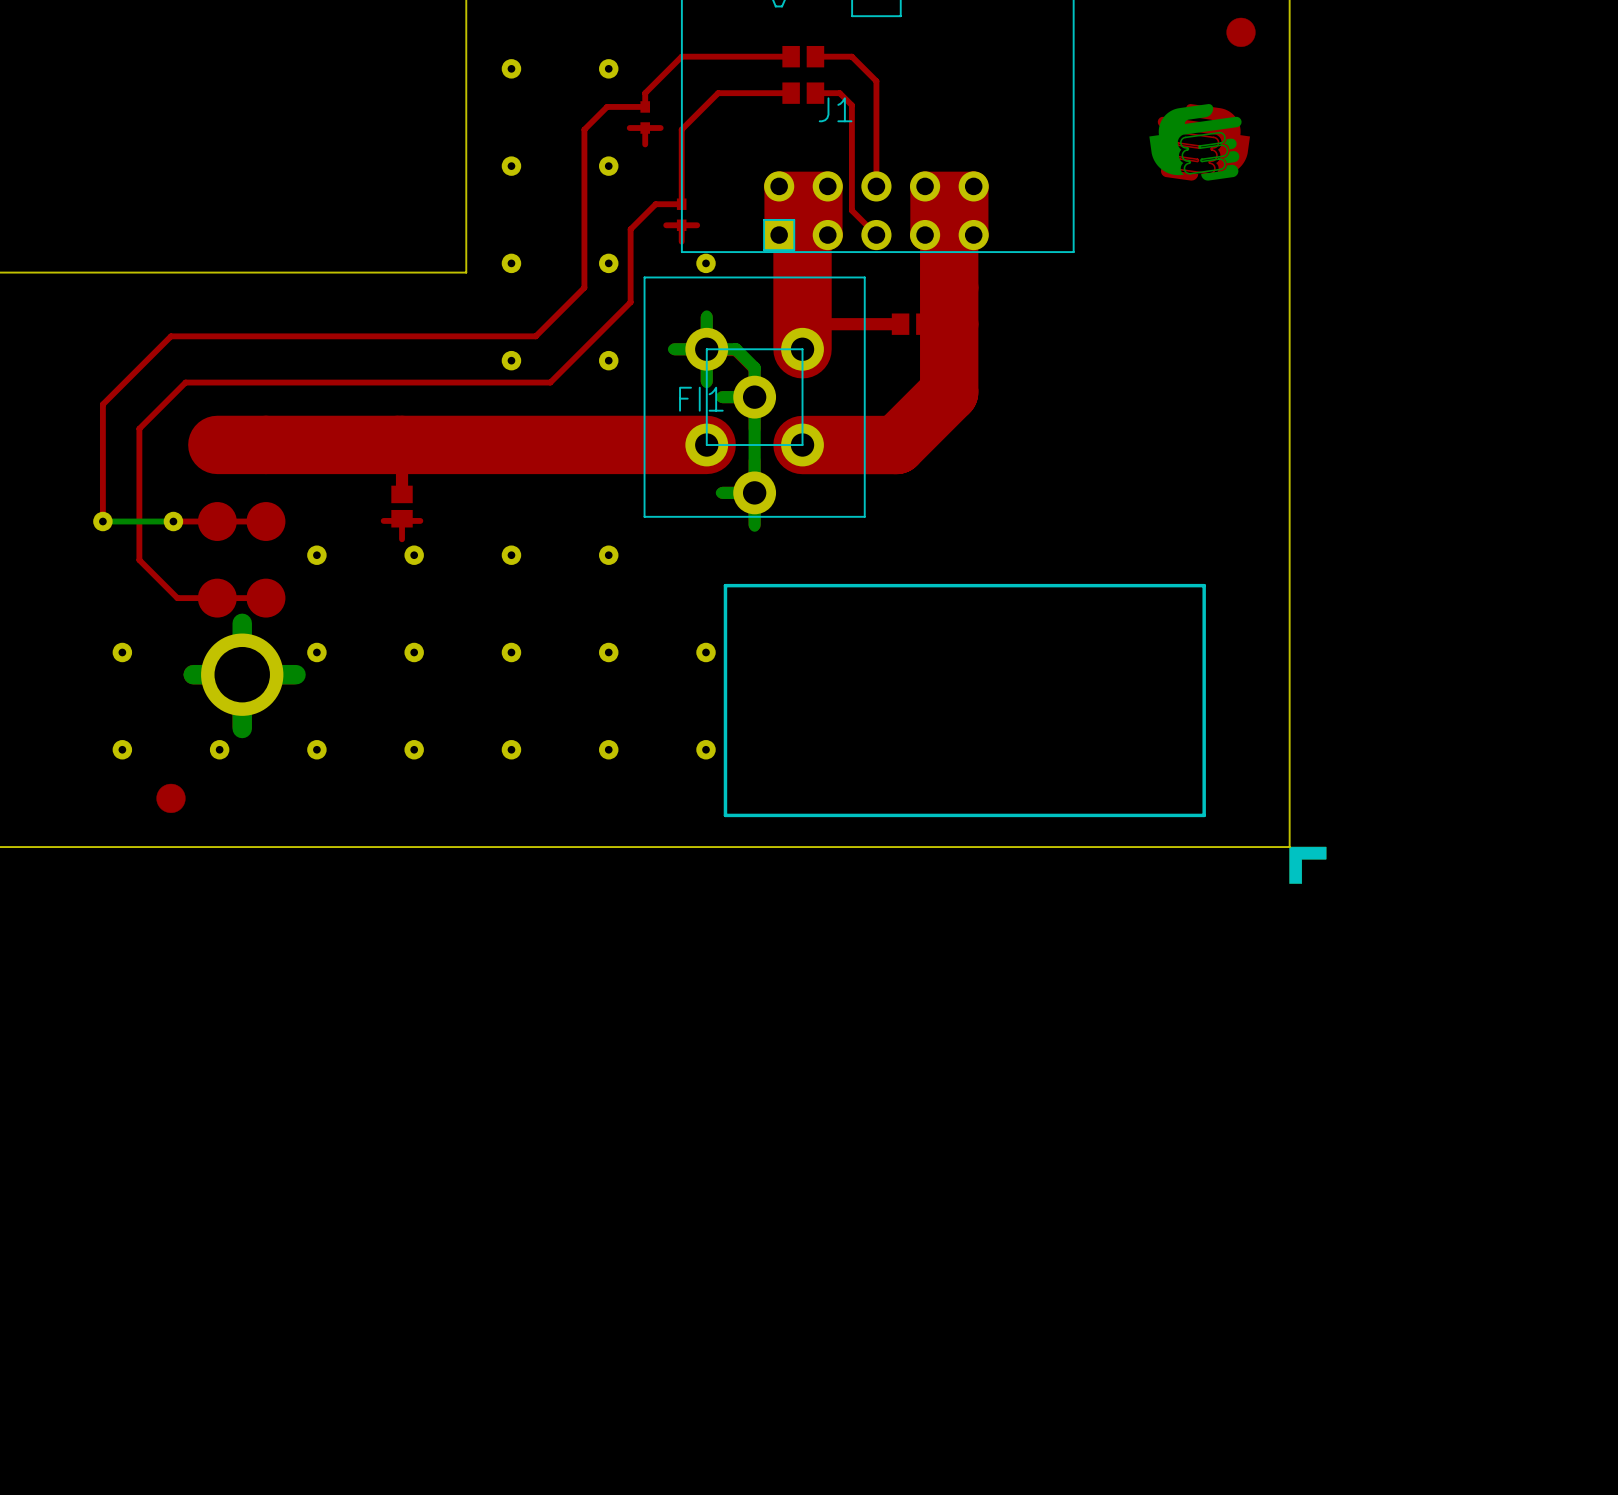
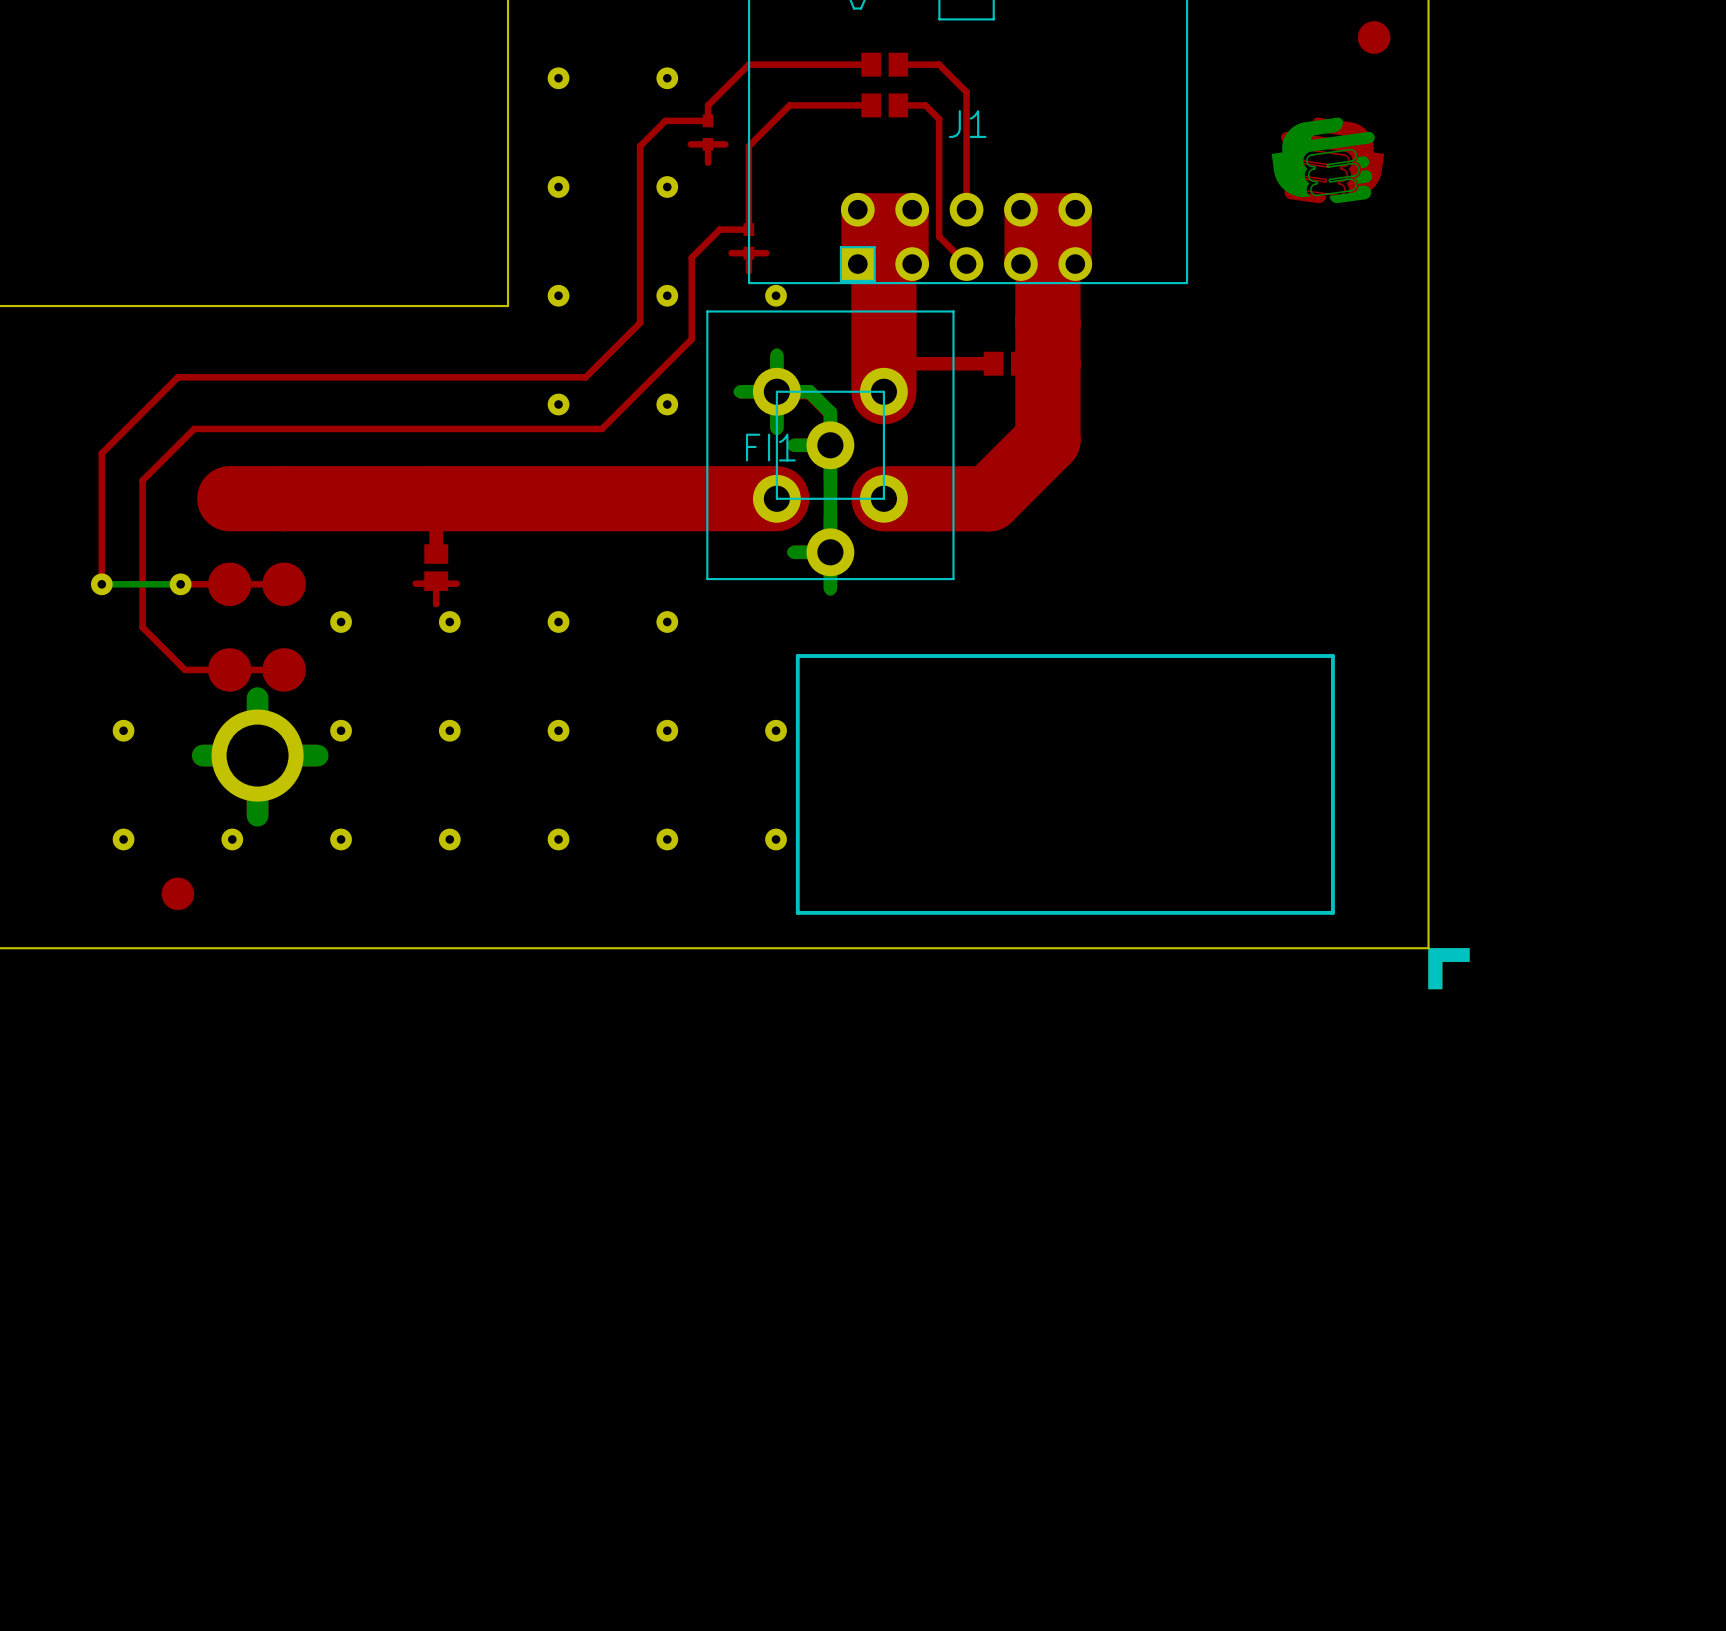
J1 name position: J1 (835, 109) -> J1 (967, 124)

